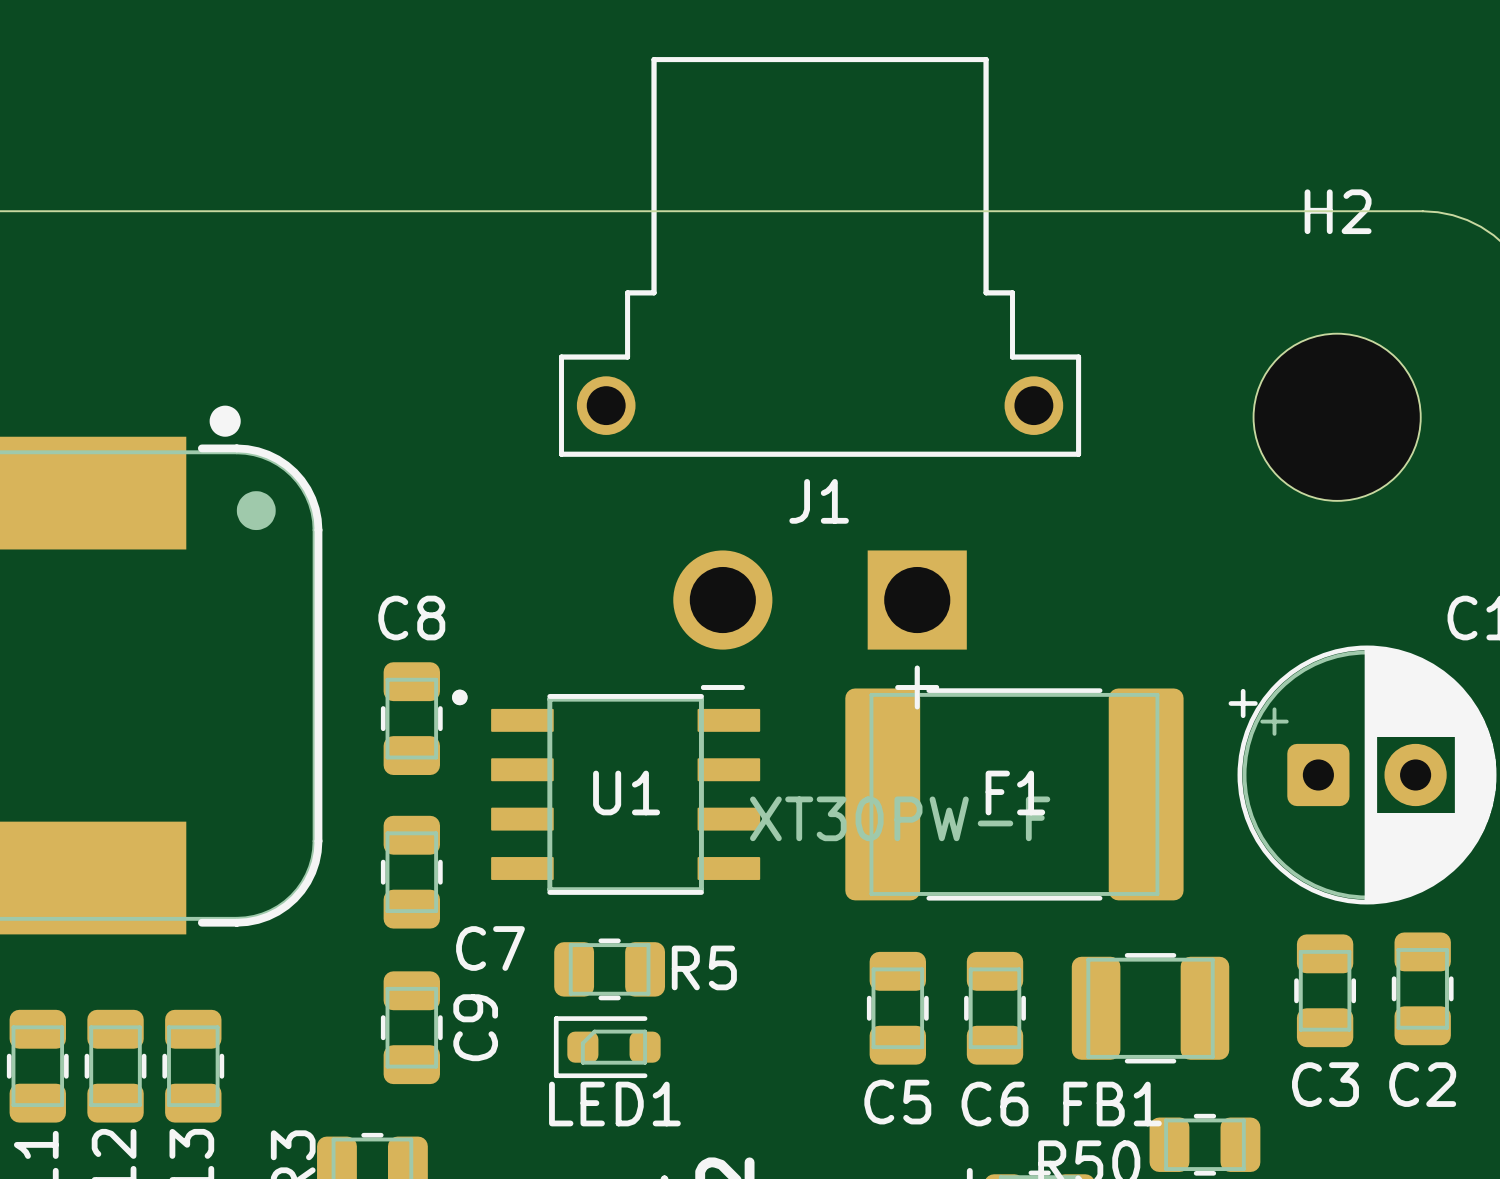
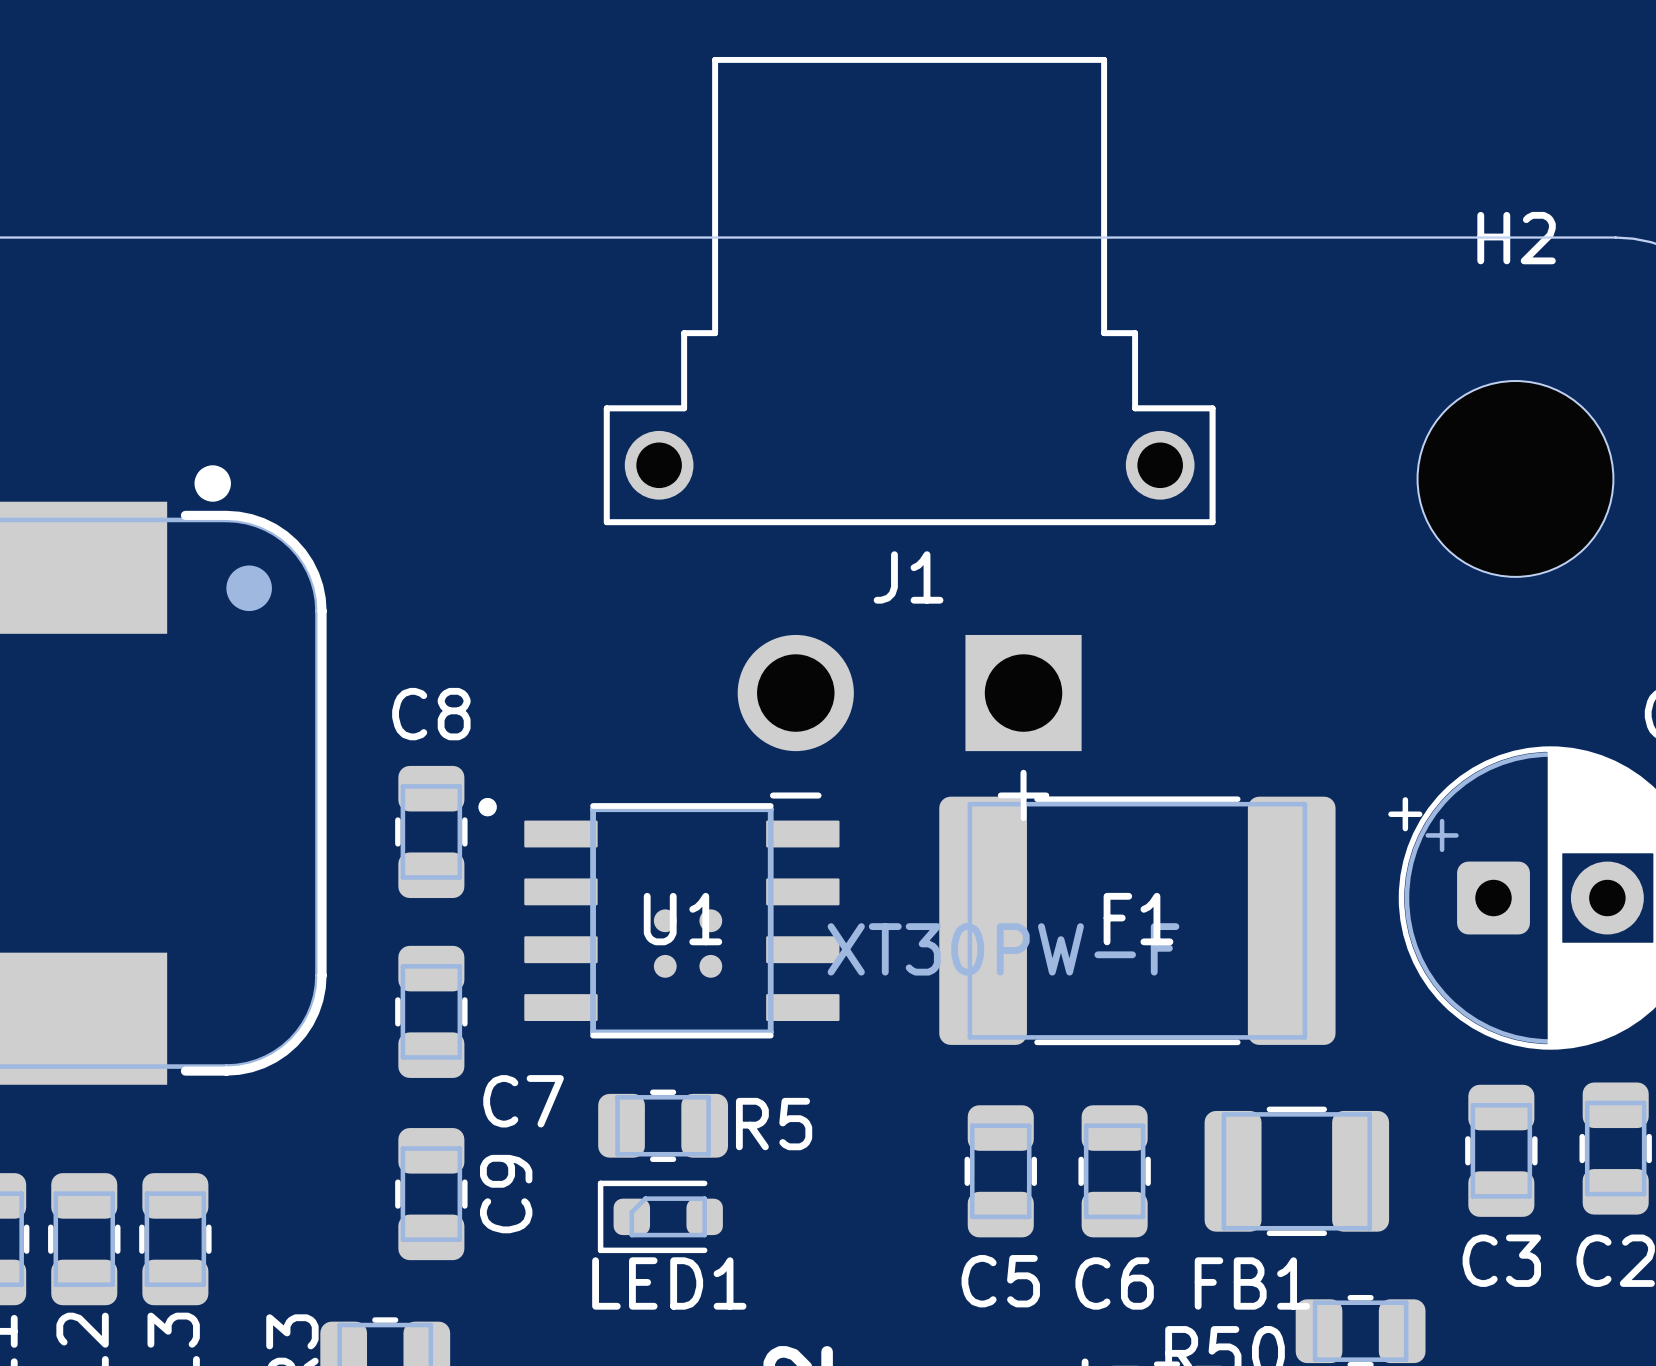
part: none -> (688, 943)

